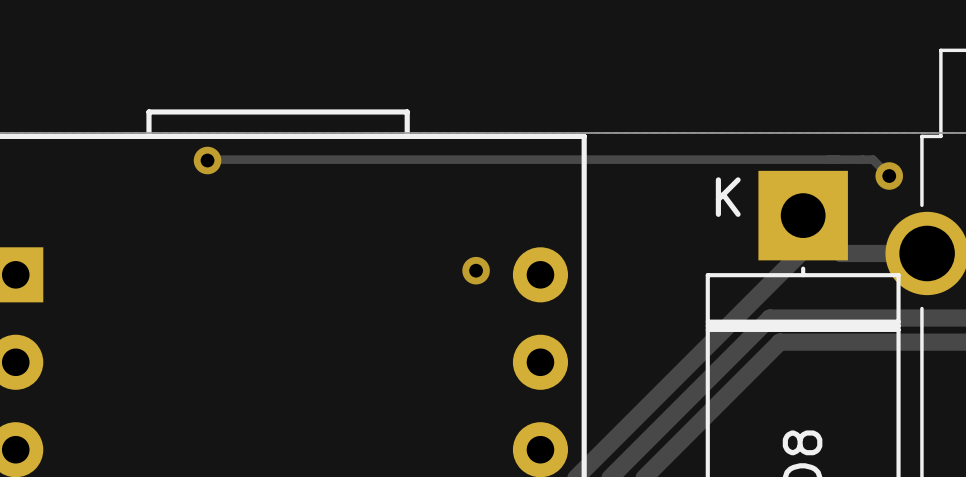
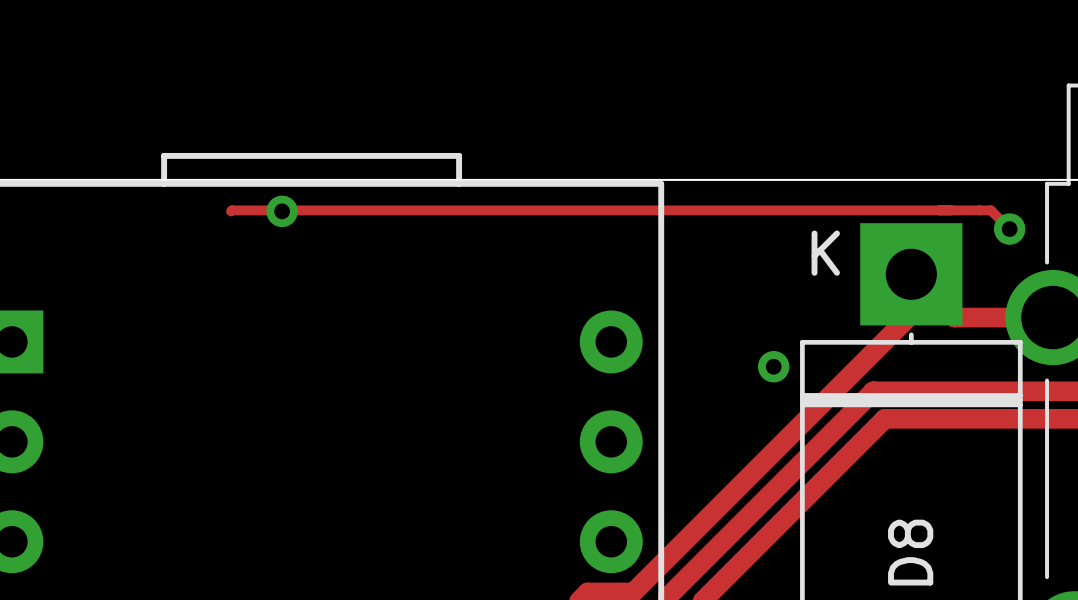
via position: (207, 160) -> (282, 211)
via: (476, 270) -> none
via: none -> (773, 366)

